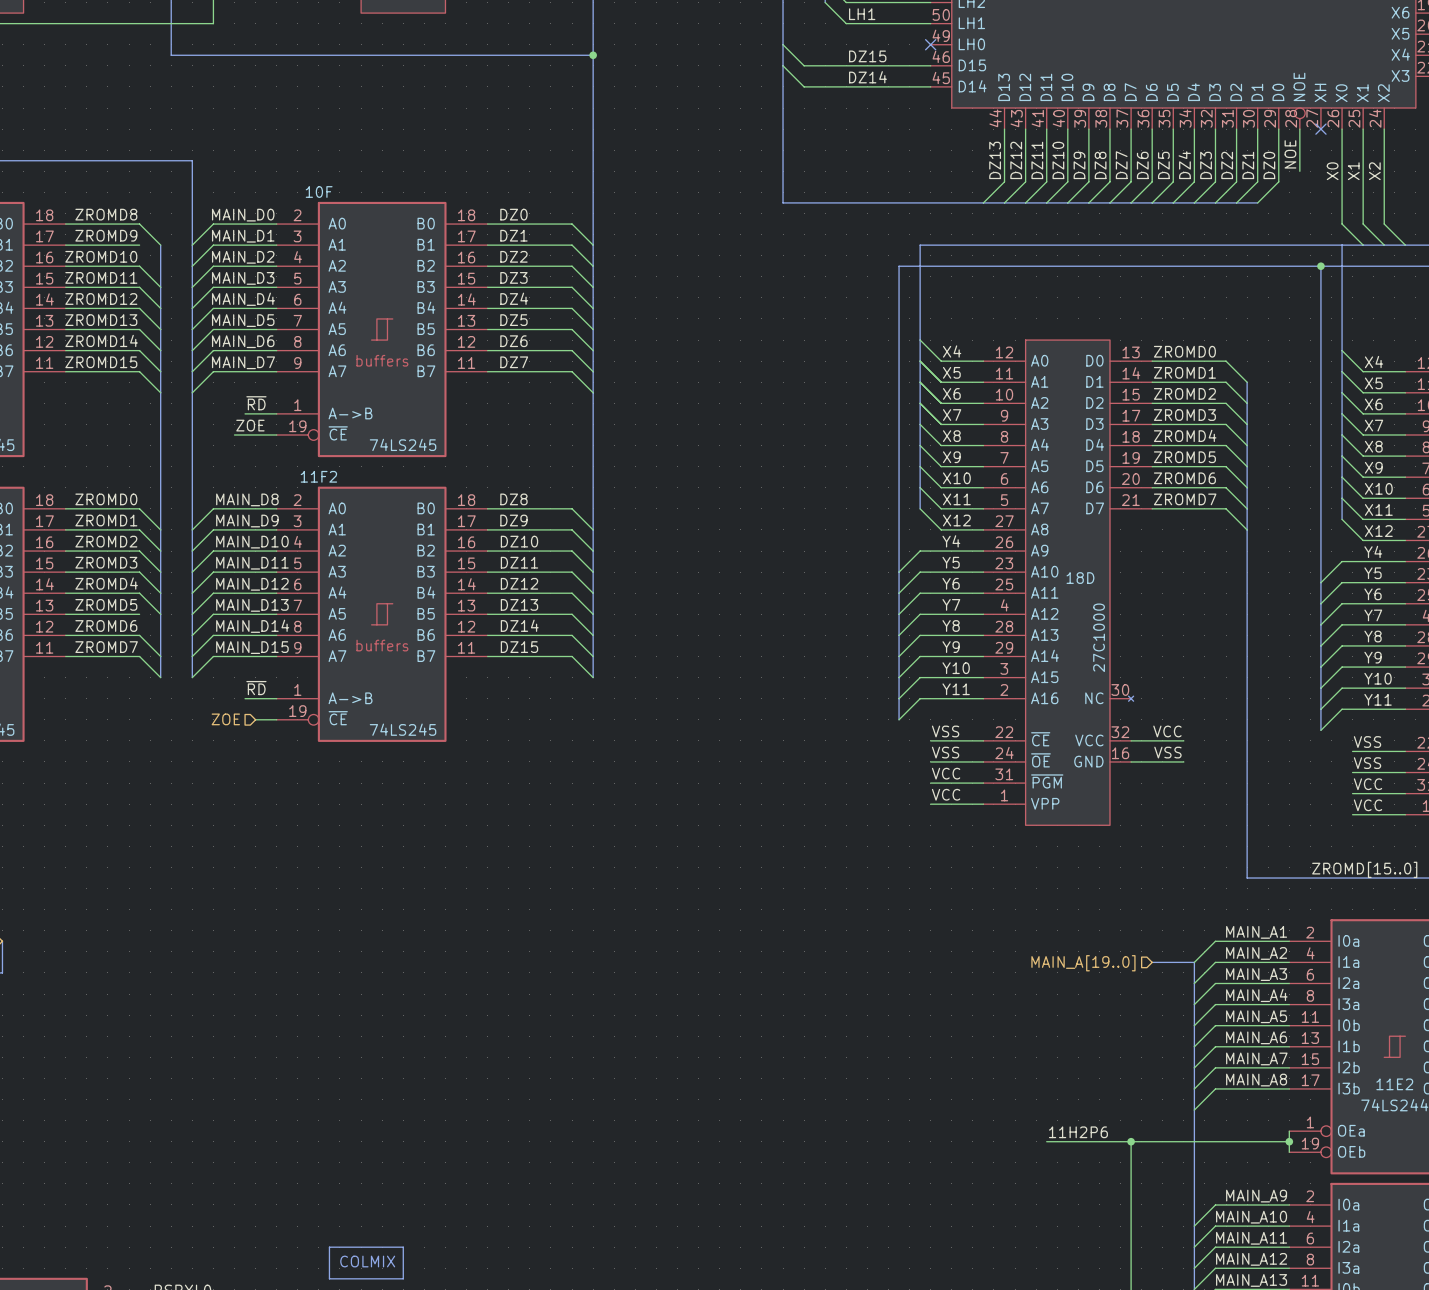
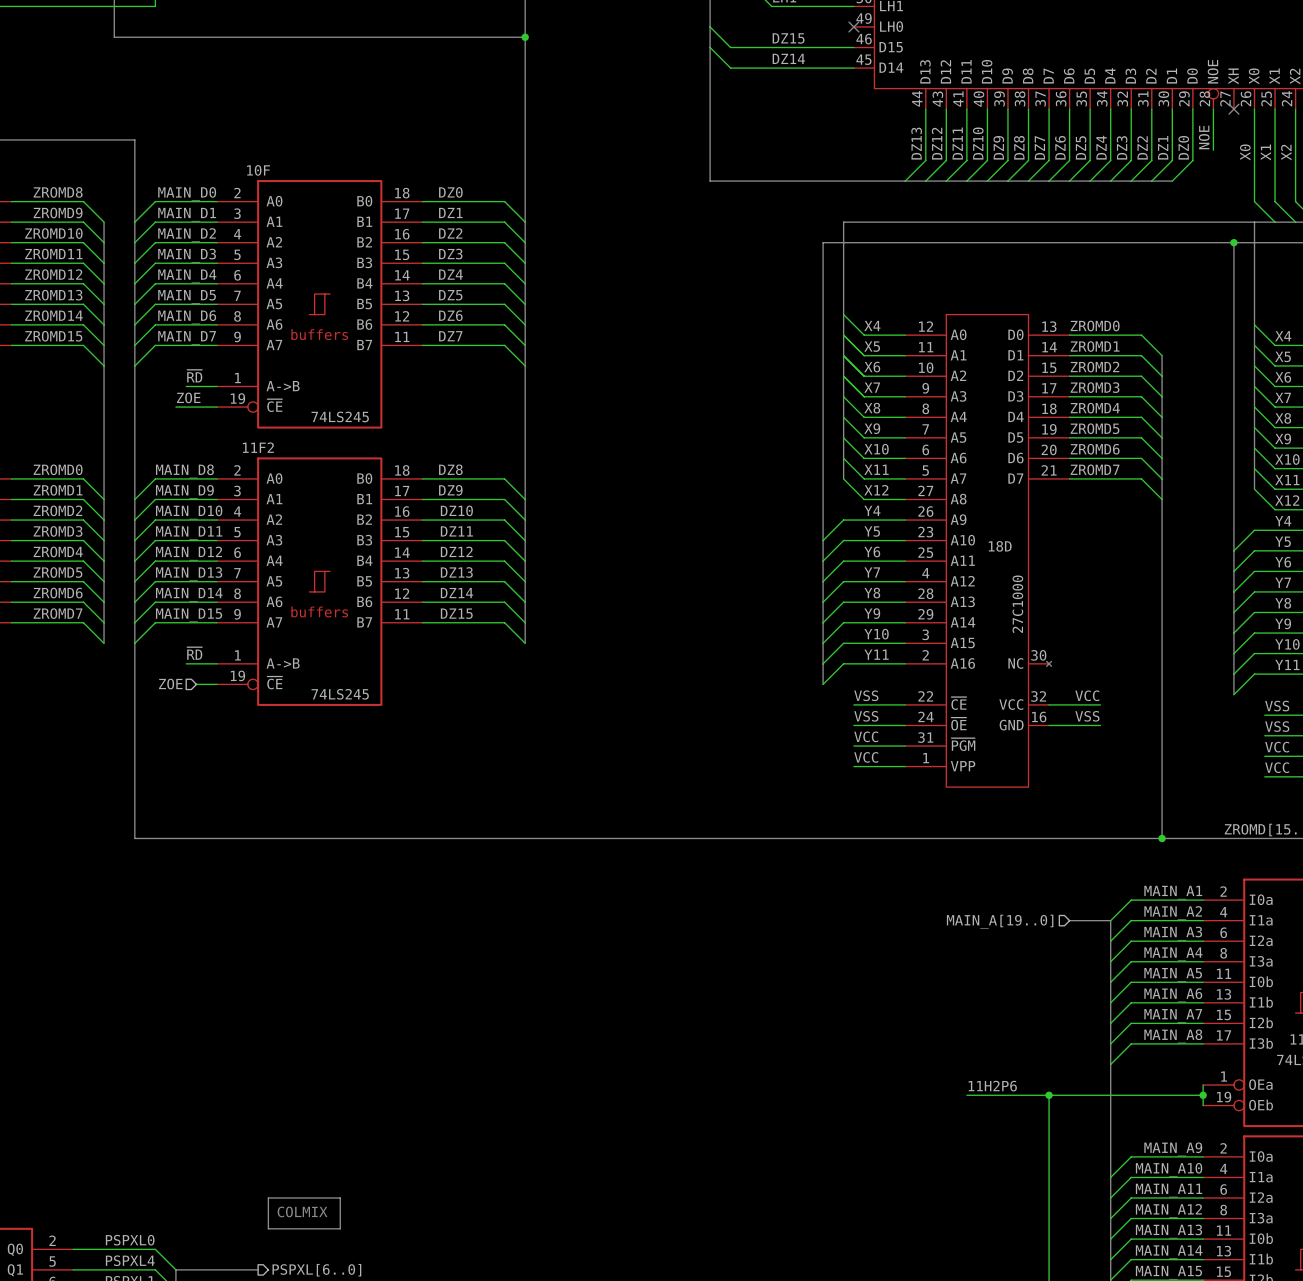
wire: none -> (83, 222) (104, 242)
wire: none -> (83, 581) (104, 602)
bus: none -> (134, 643) (134, 838) (1162, 838)
junction: none -> (1162, 838)

